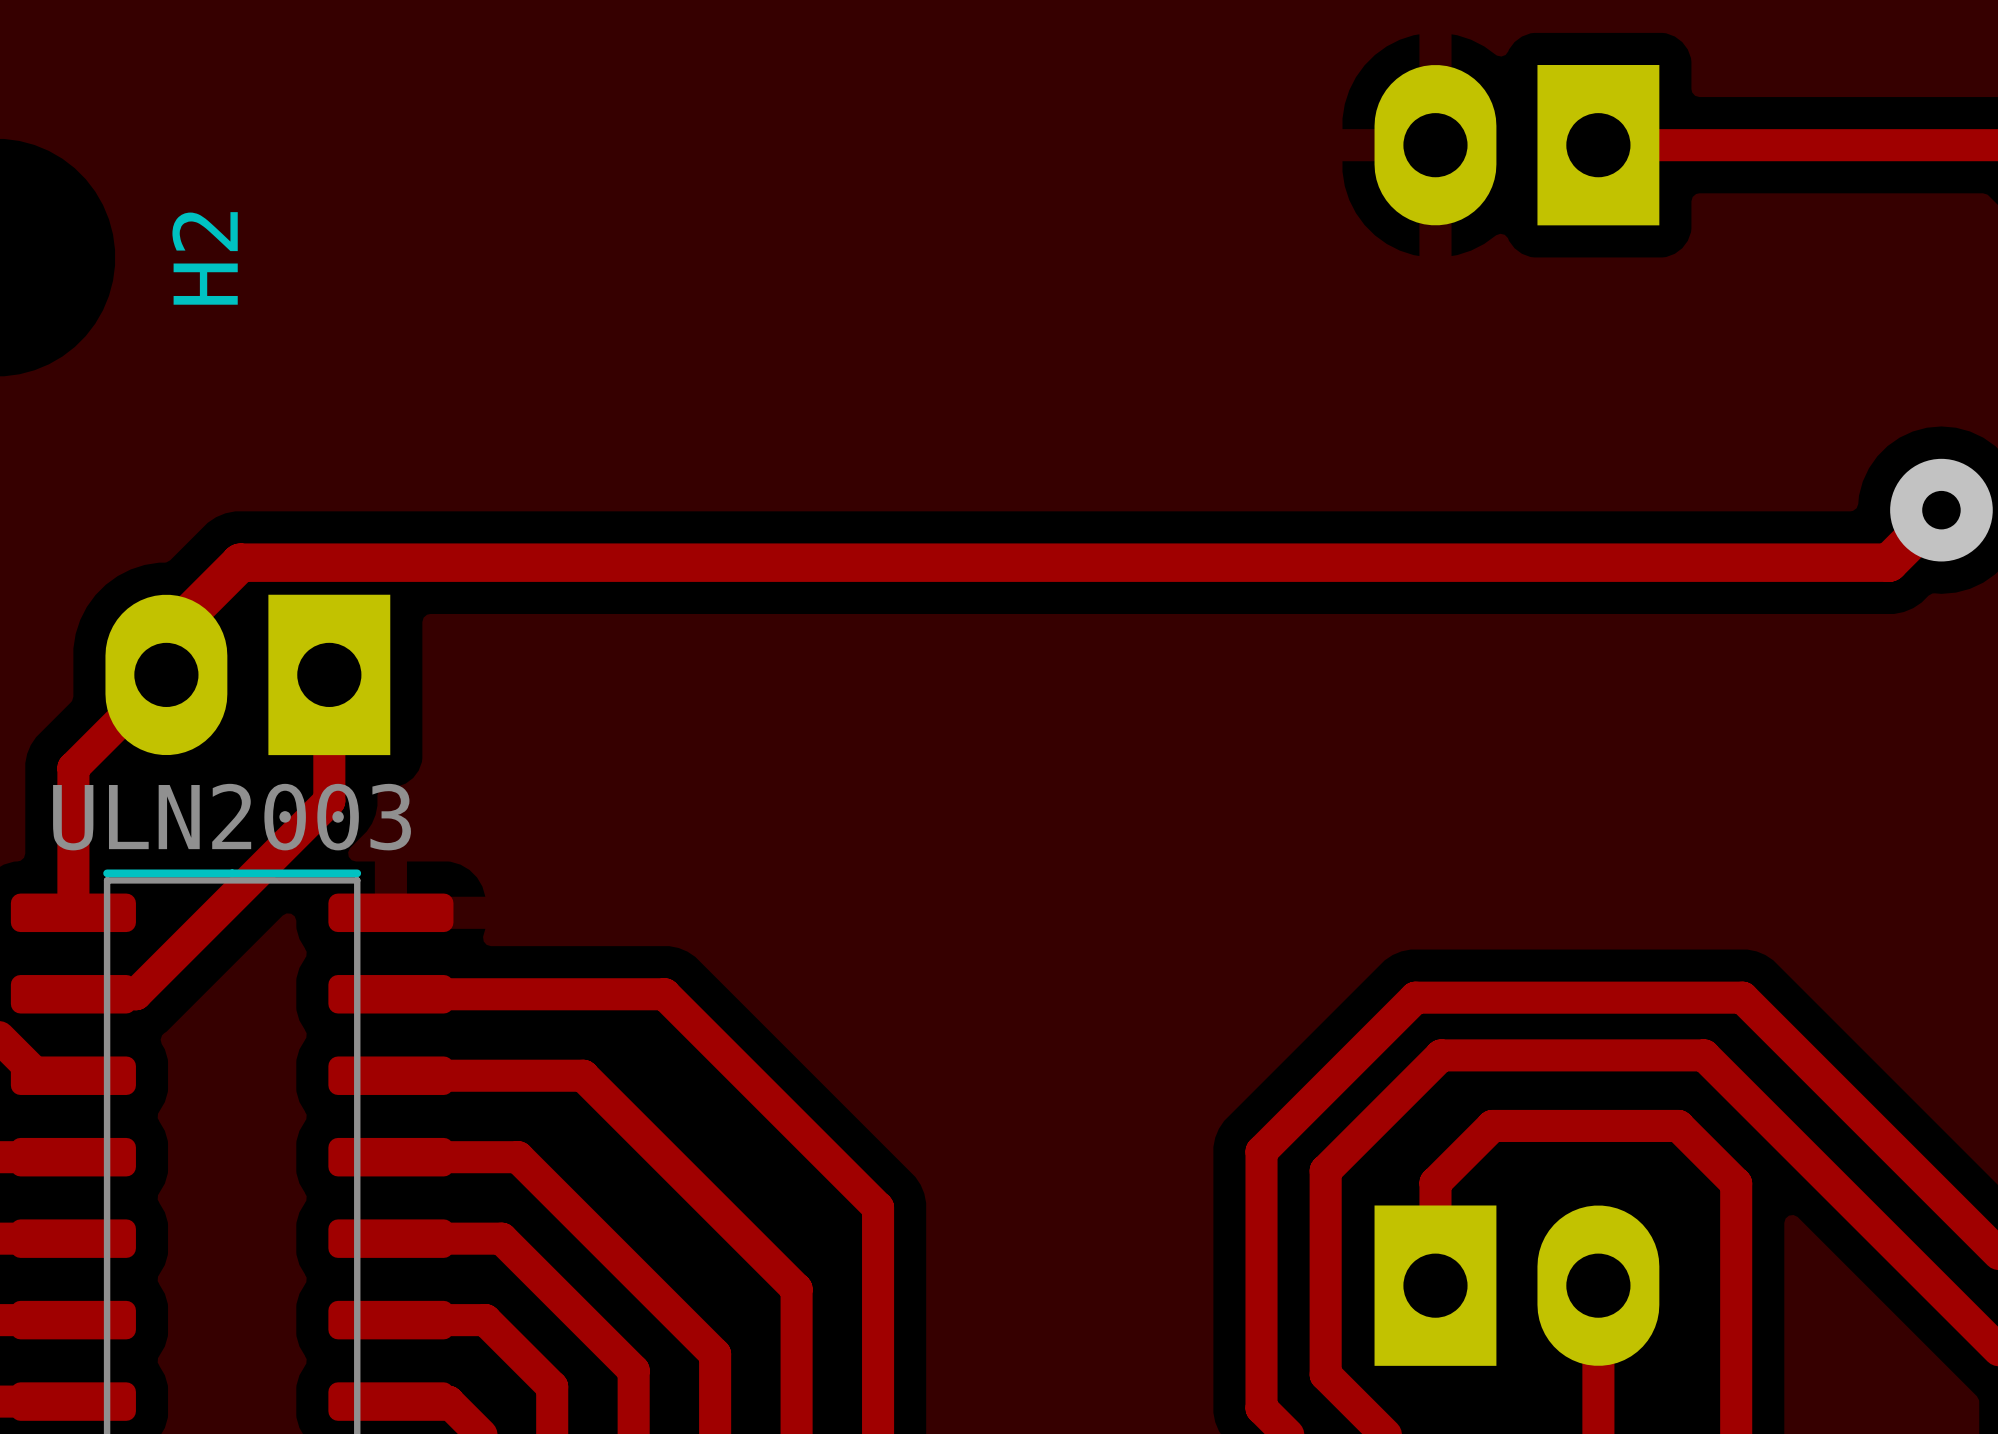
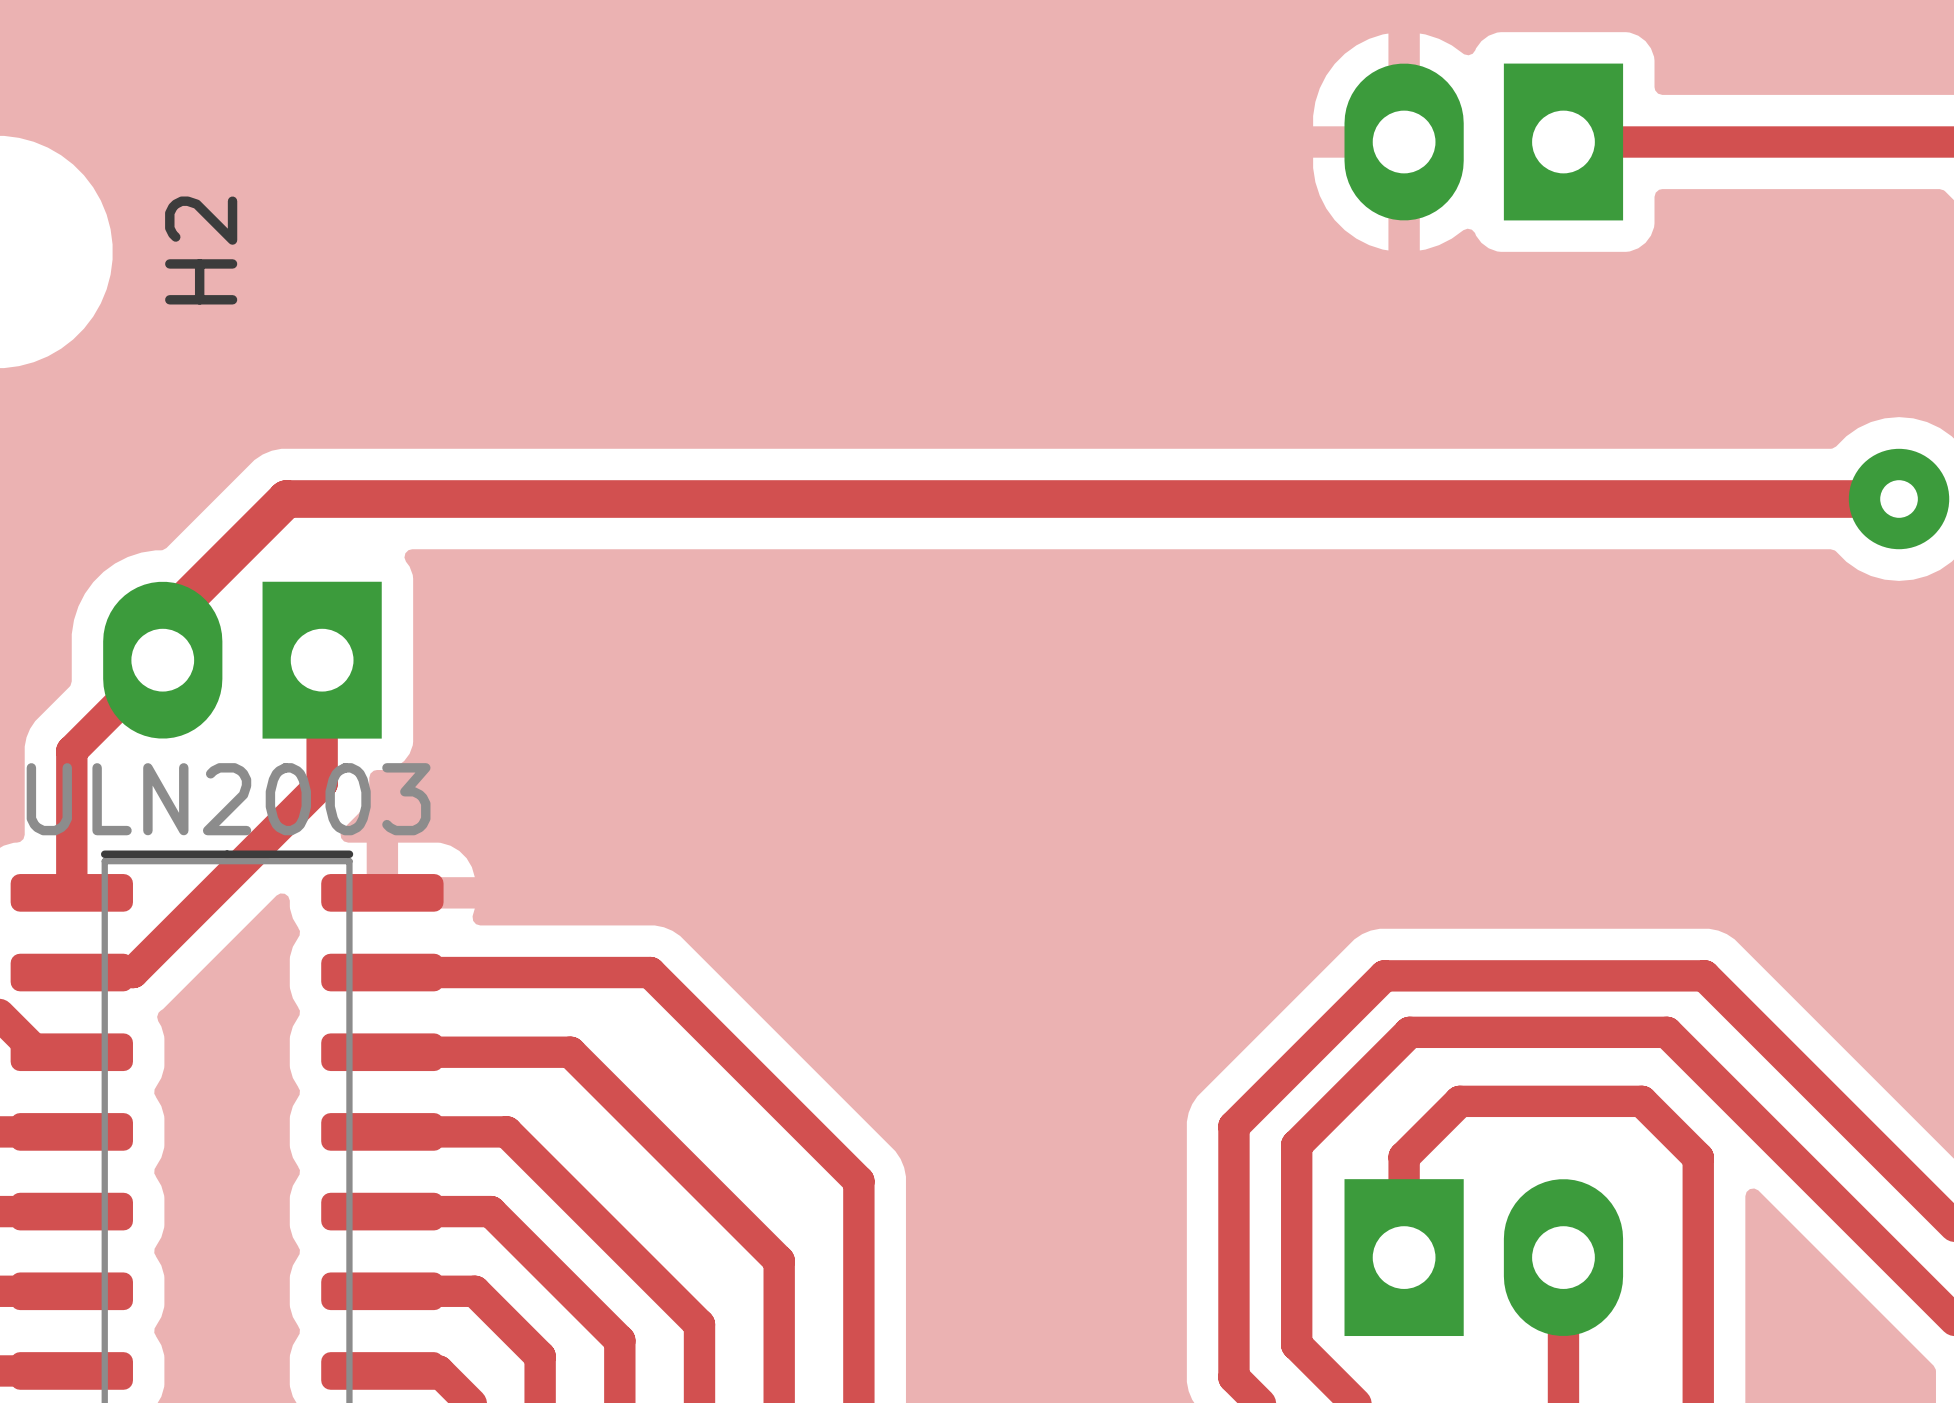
track: (1941, 510) (1888, 562) (240, 562) -> (1899, 499) (286, 499) (235, 550)

